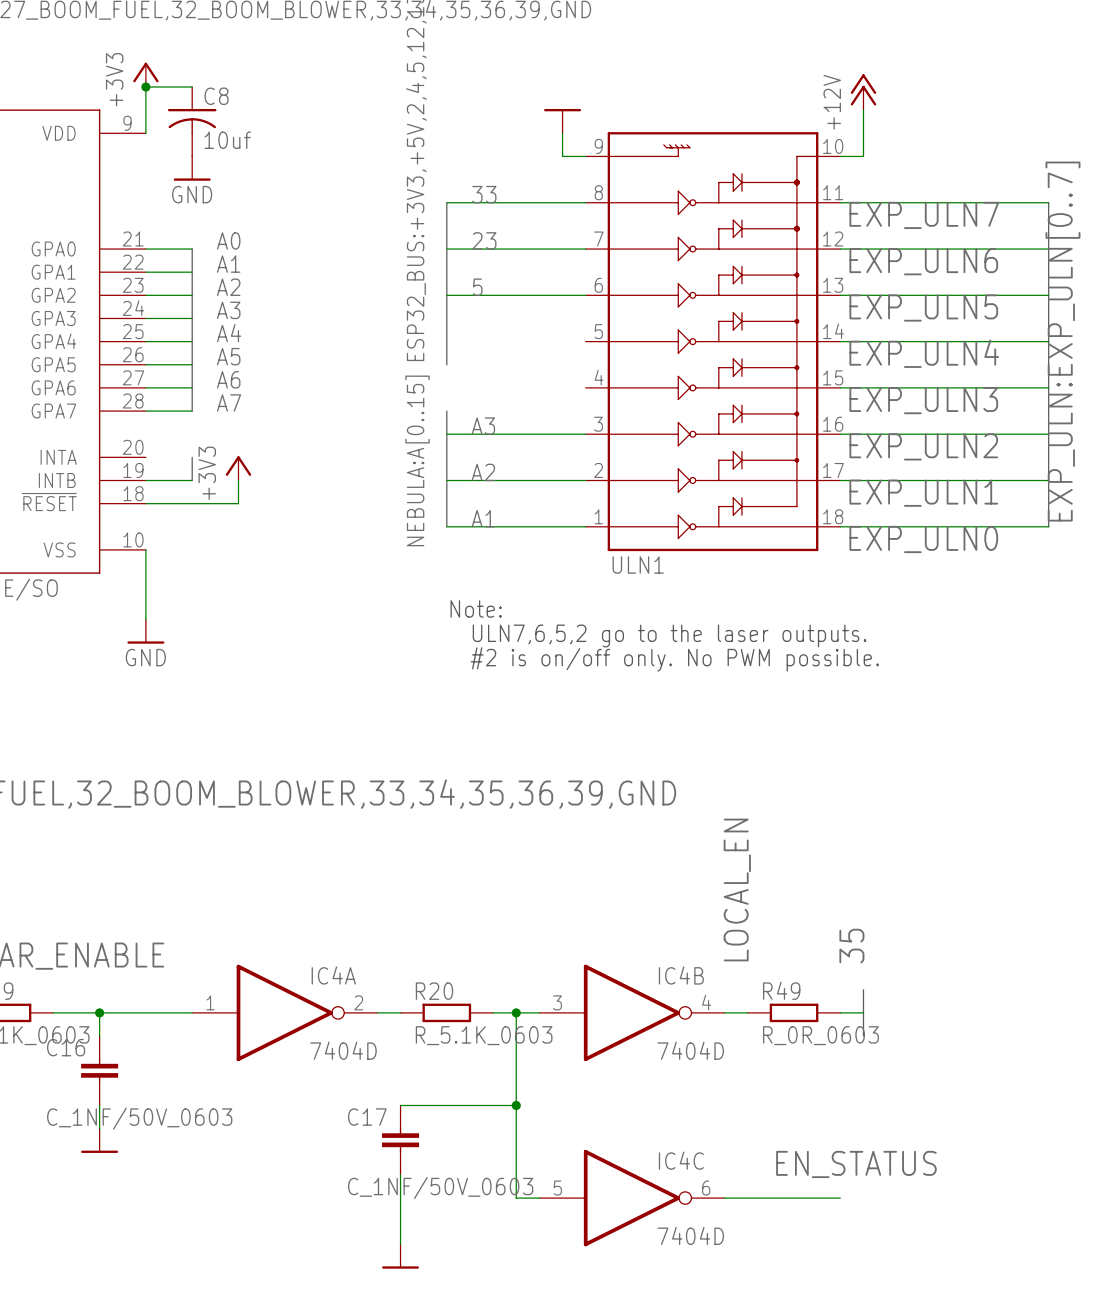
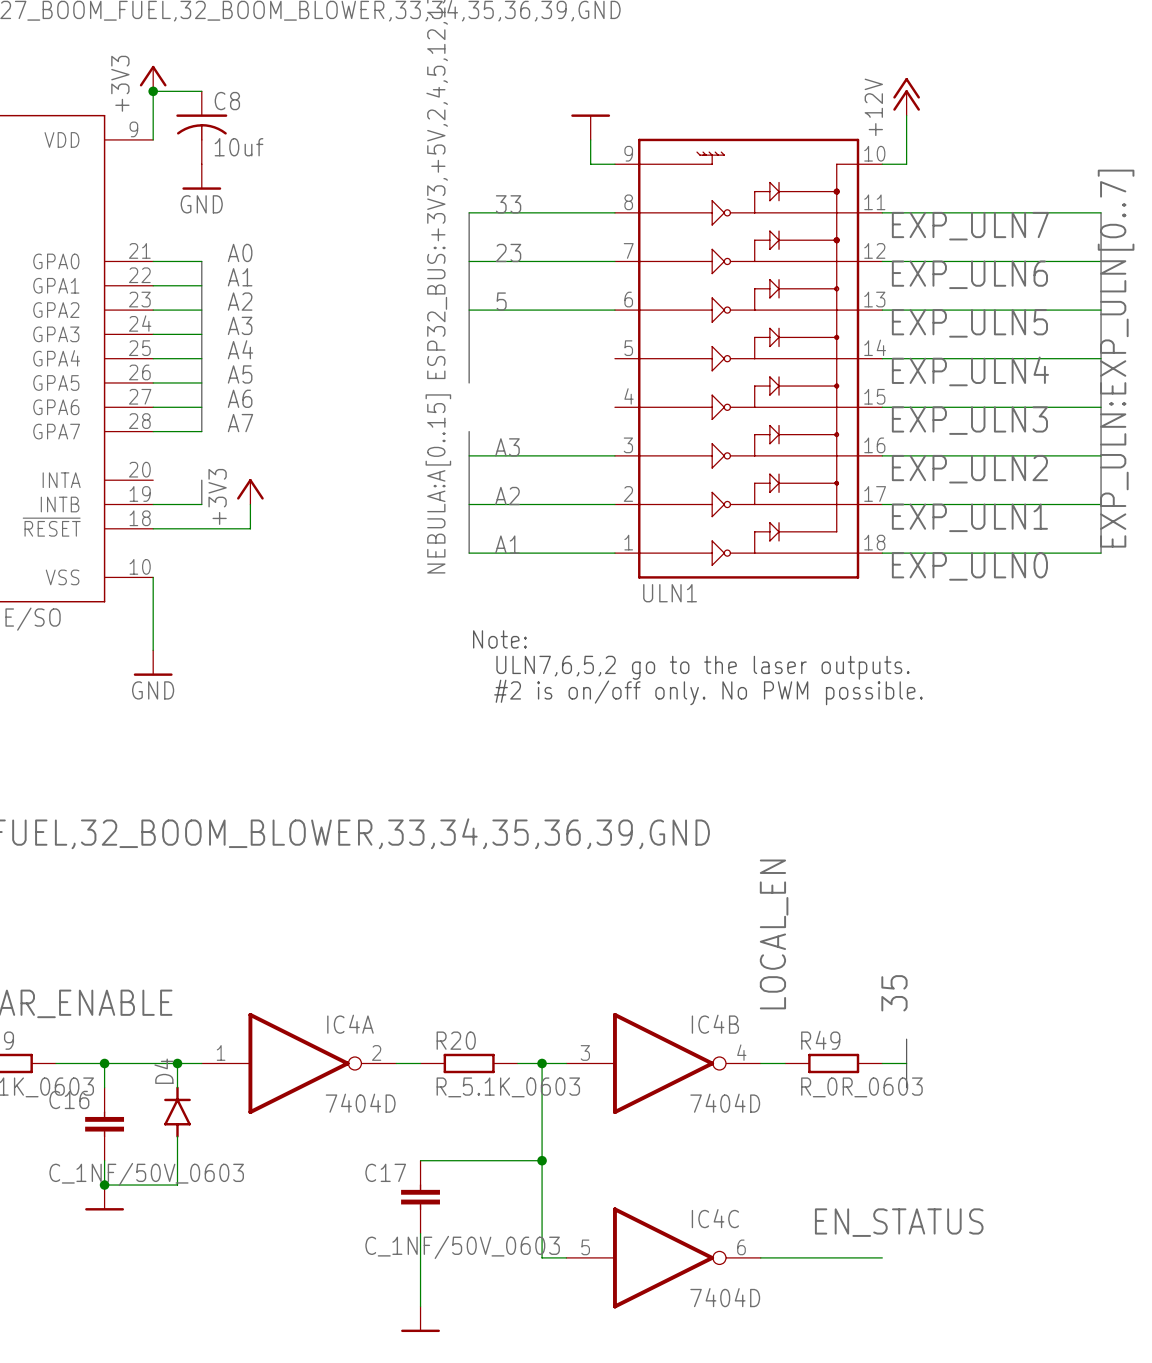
wire: none -> (177, 1063) (177, 1087)
junction: none -> (177, 1063)
D4: none -> (177, 1112)
wire: none -> (177, 1136) (177, 1185) (104, 1185)
junction: none -> (104, 1185)

